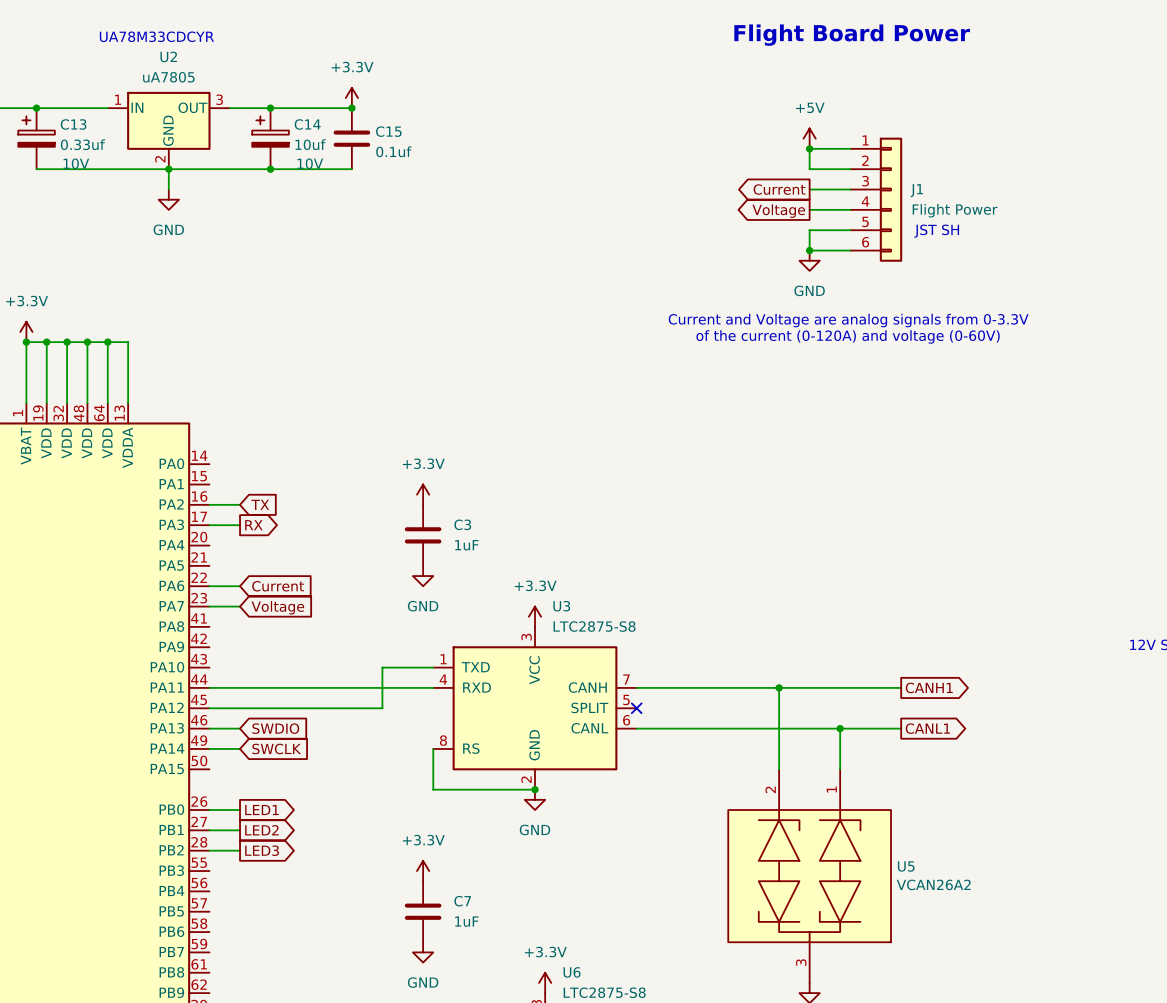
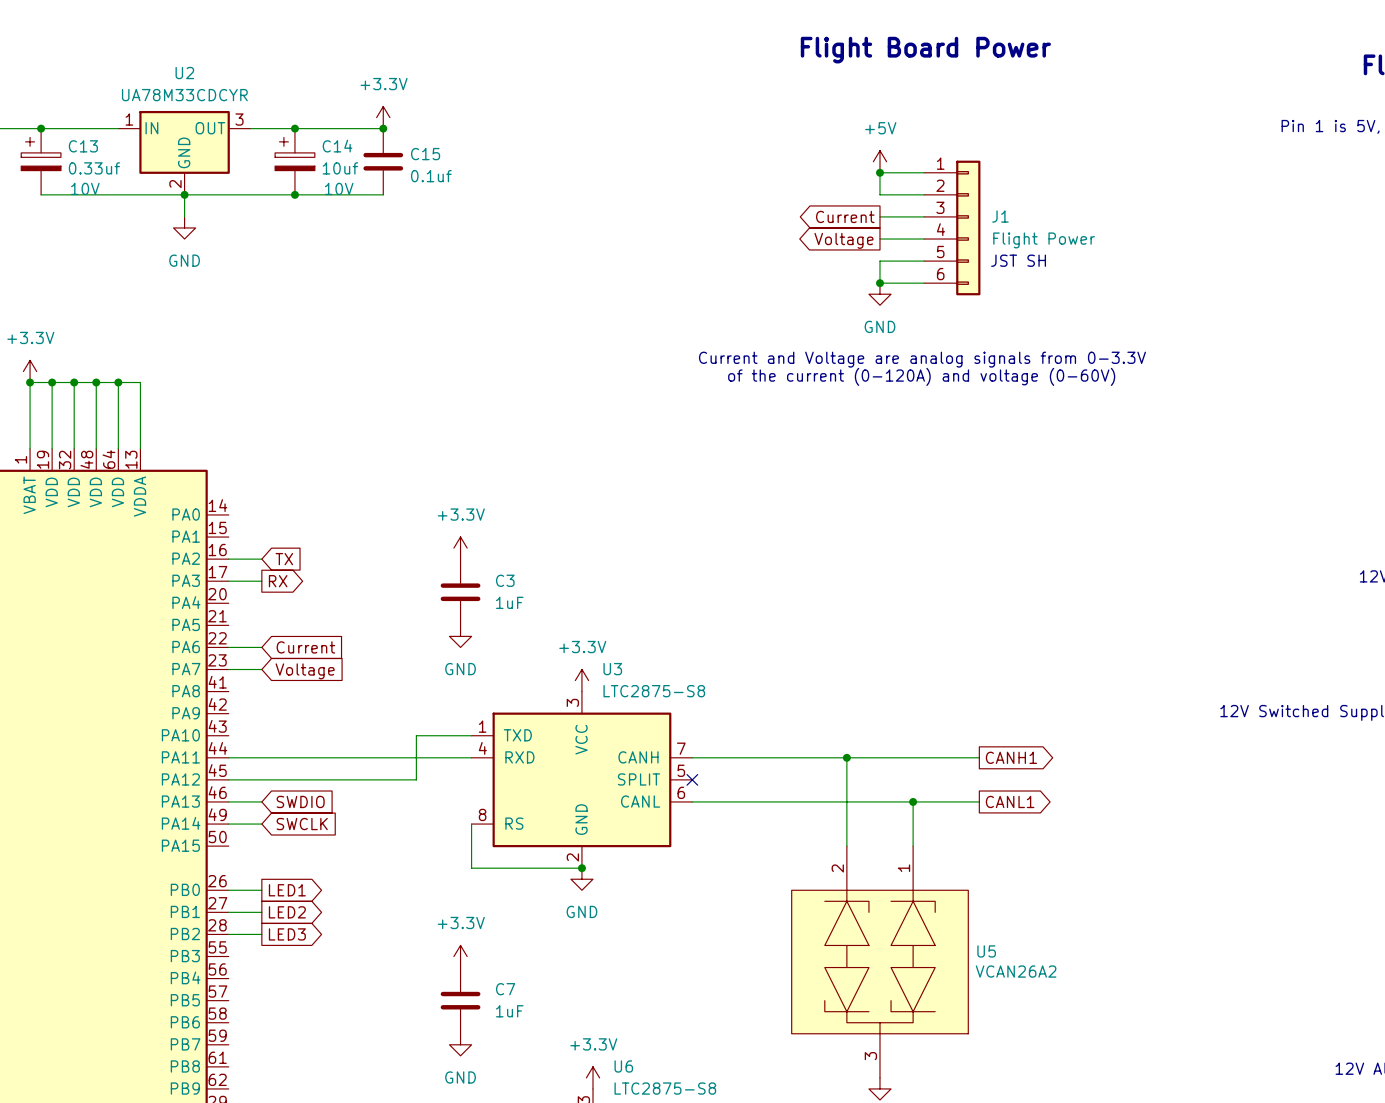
text: UA78M33CDCYR (156, 36) -> none
U2 value: uA7805 (168, 77) -> UA78M33CDCYR (184, 95)

